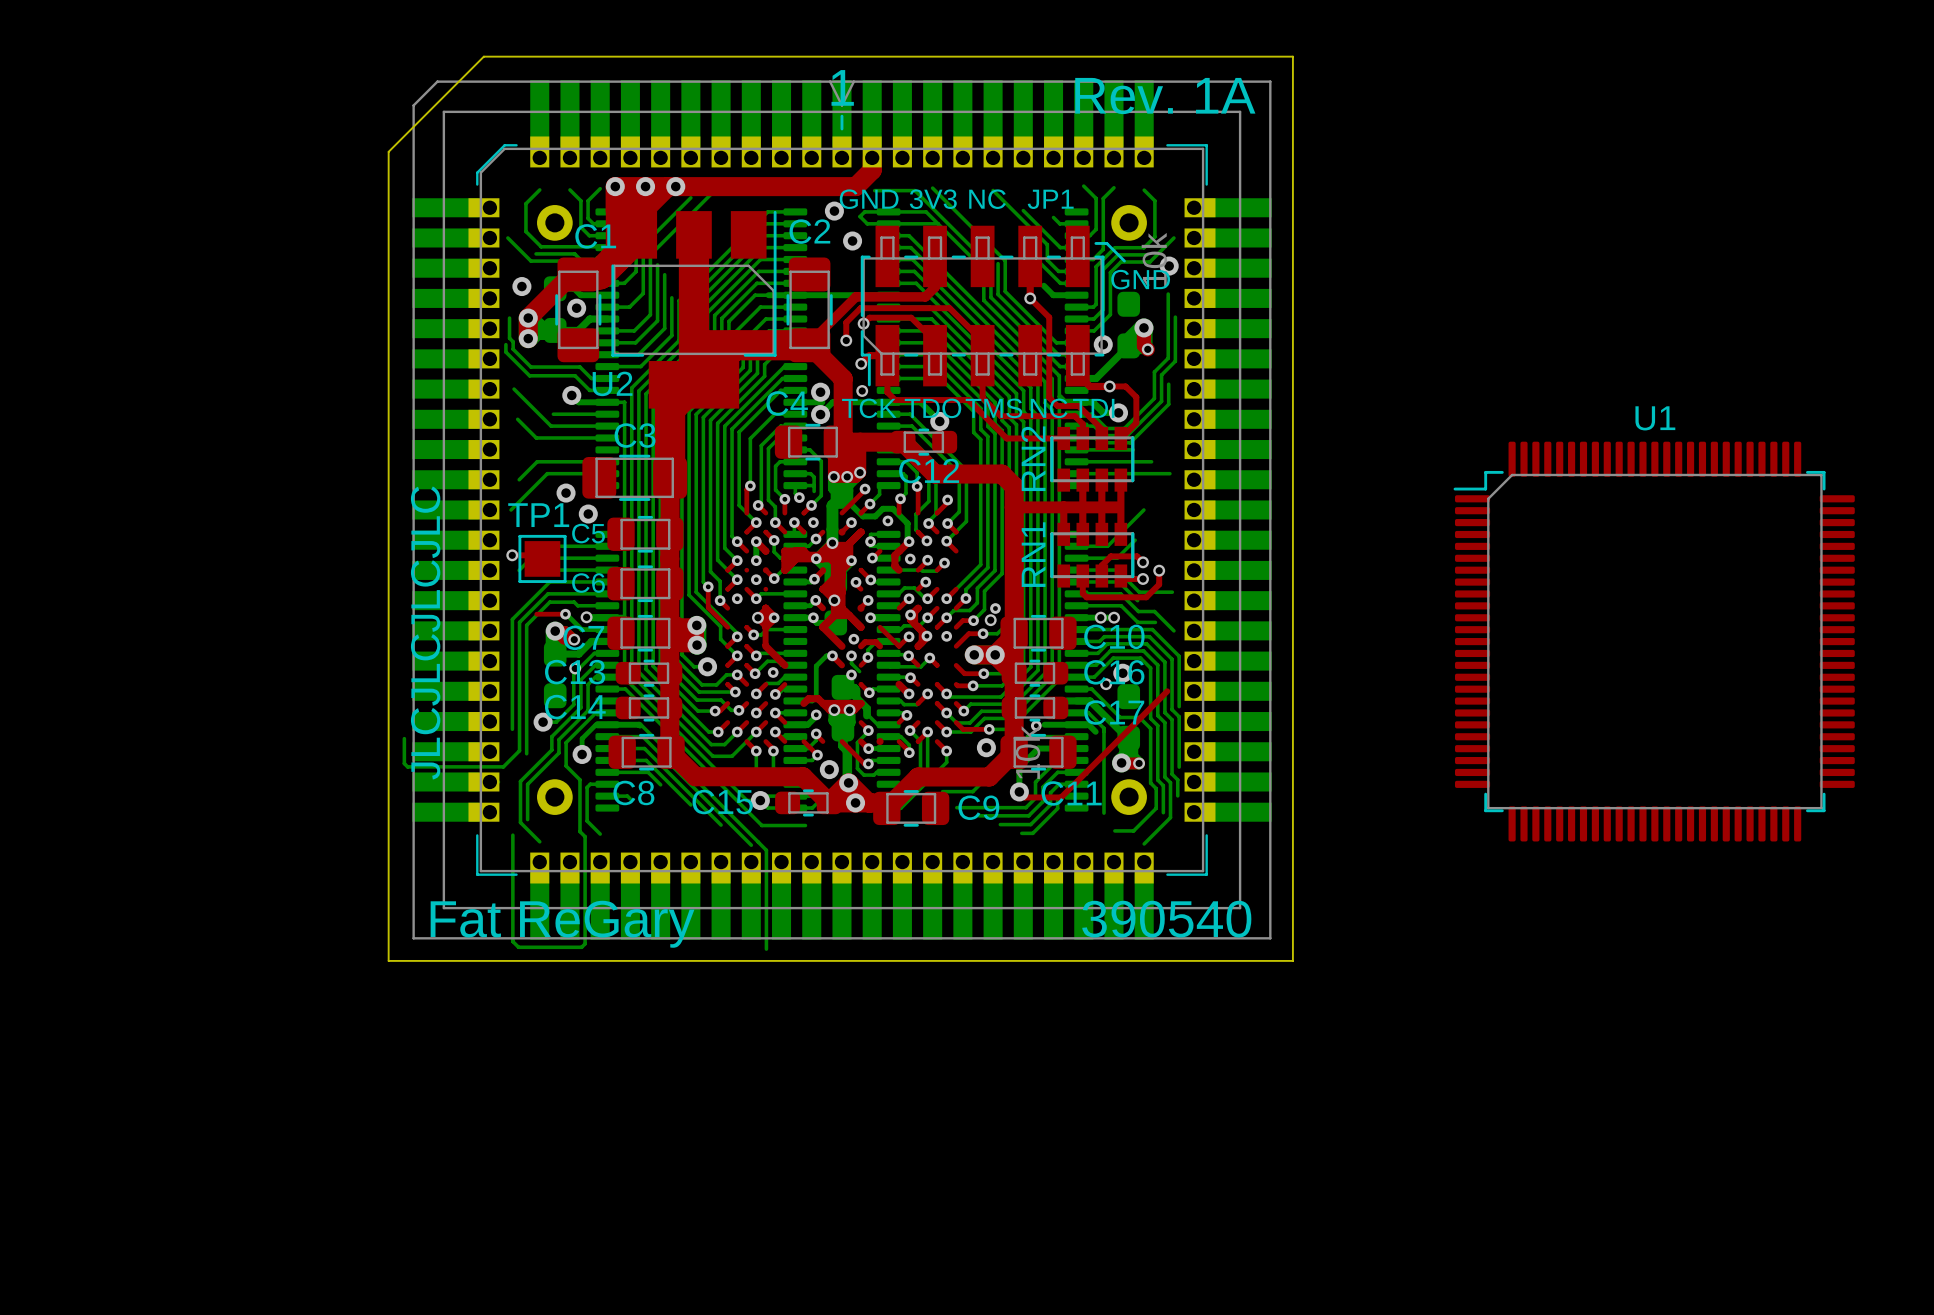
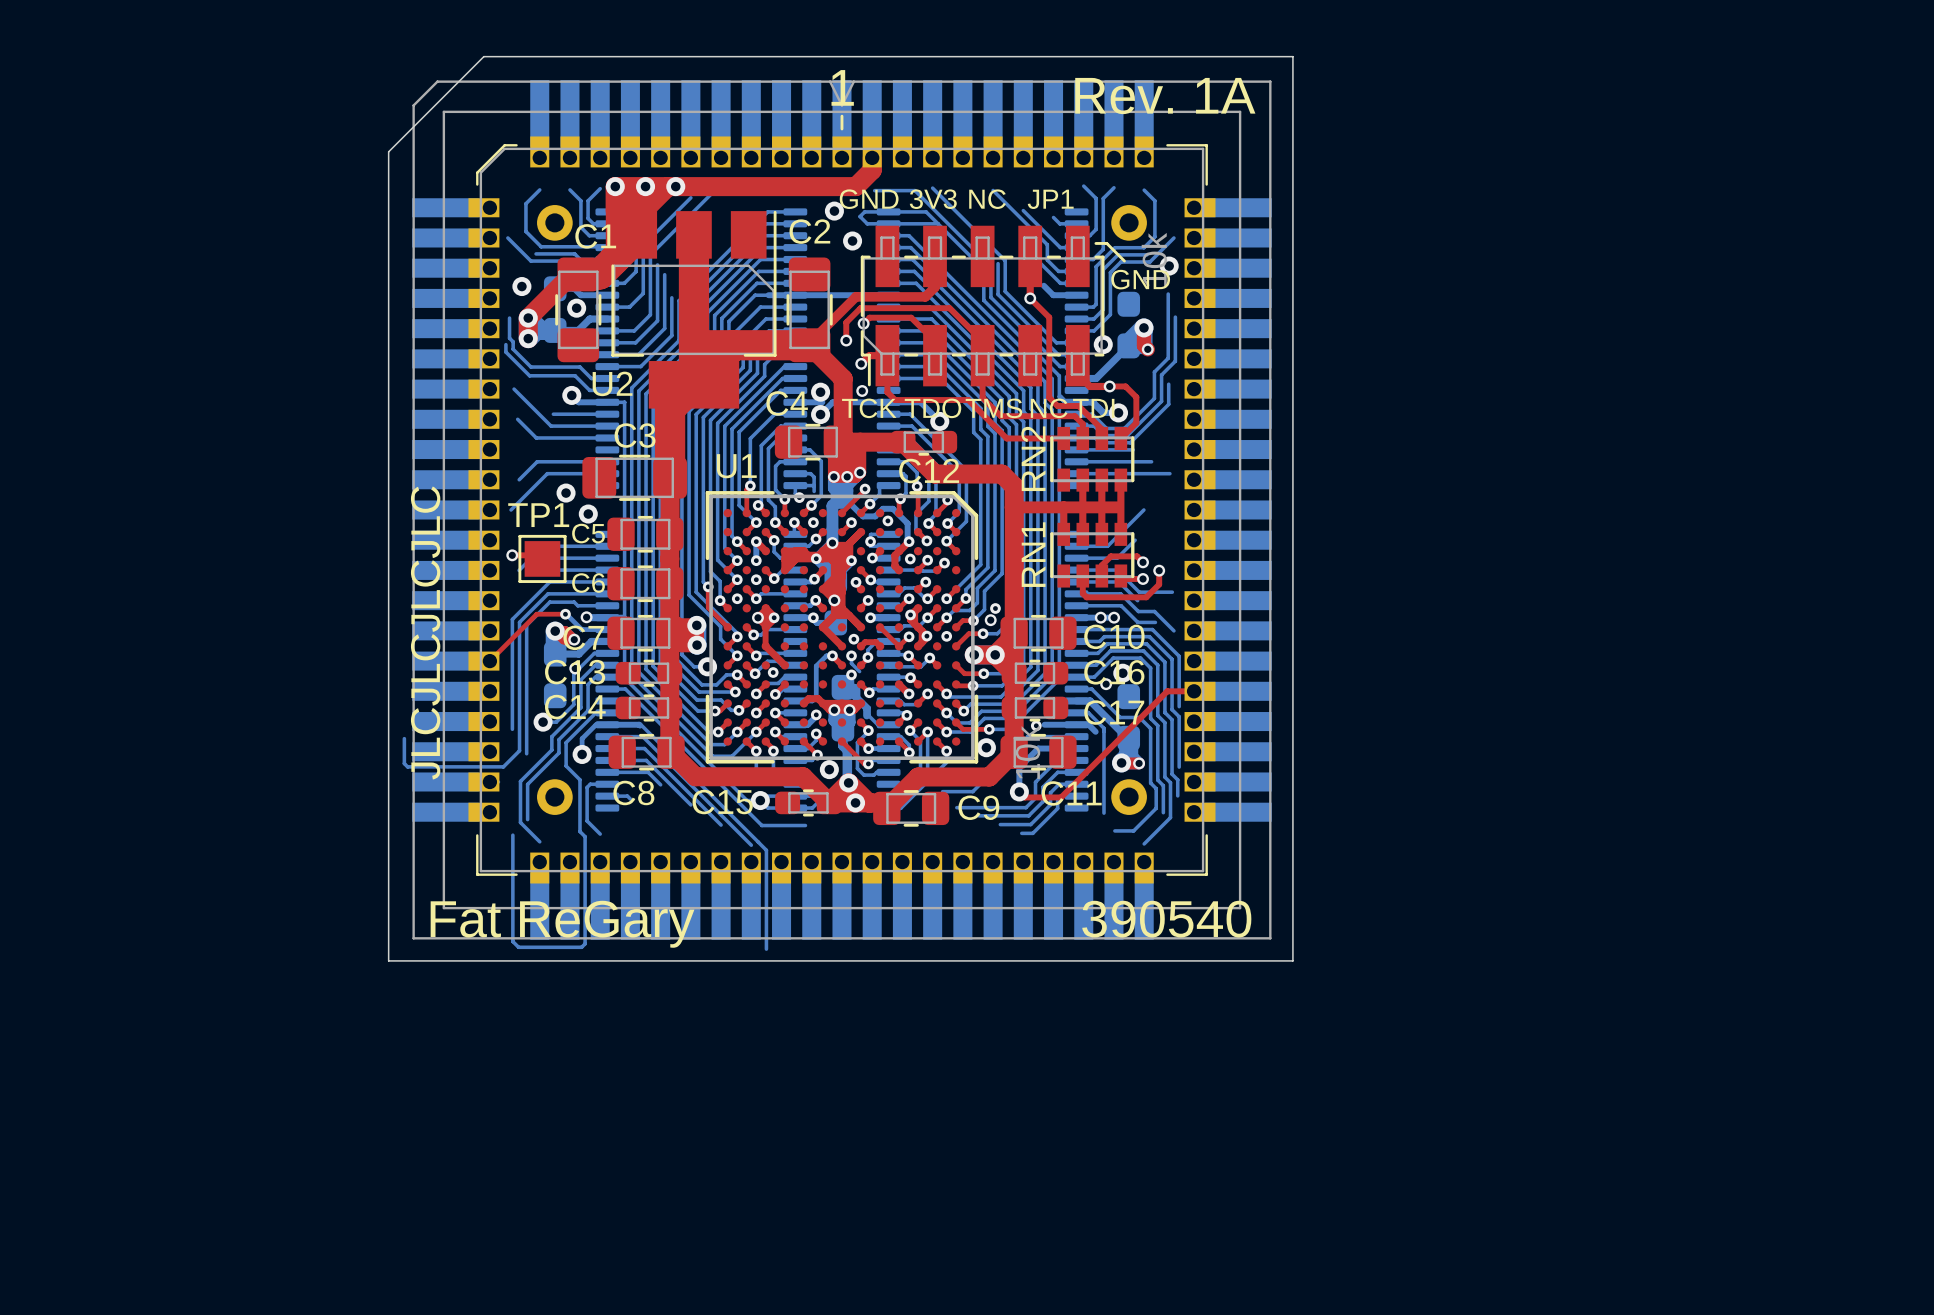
U1 name position: U1 (1655, 418) -> U1 (736, 466)
U1 footprint: [1453, 441, 1855, 842] -> [705, 491, 979, 764]
top track: none -> (536, 614) (489, 661)
top track: none -> (1167, 691) (1194, 691)

